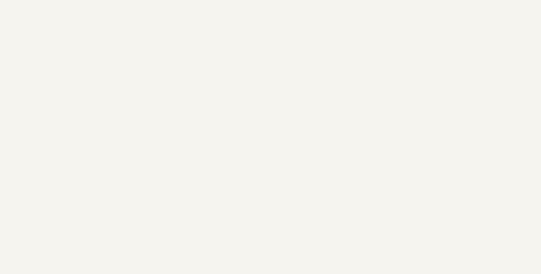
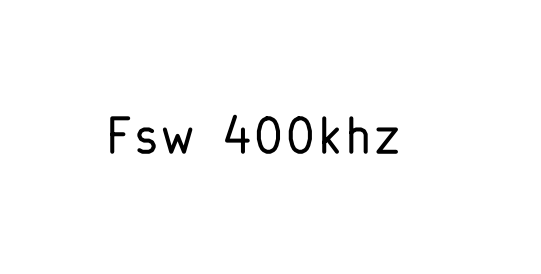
text: none -> Fsw 400khz (254, 134)

